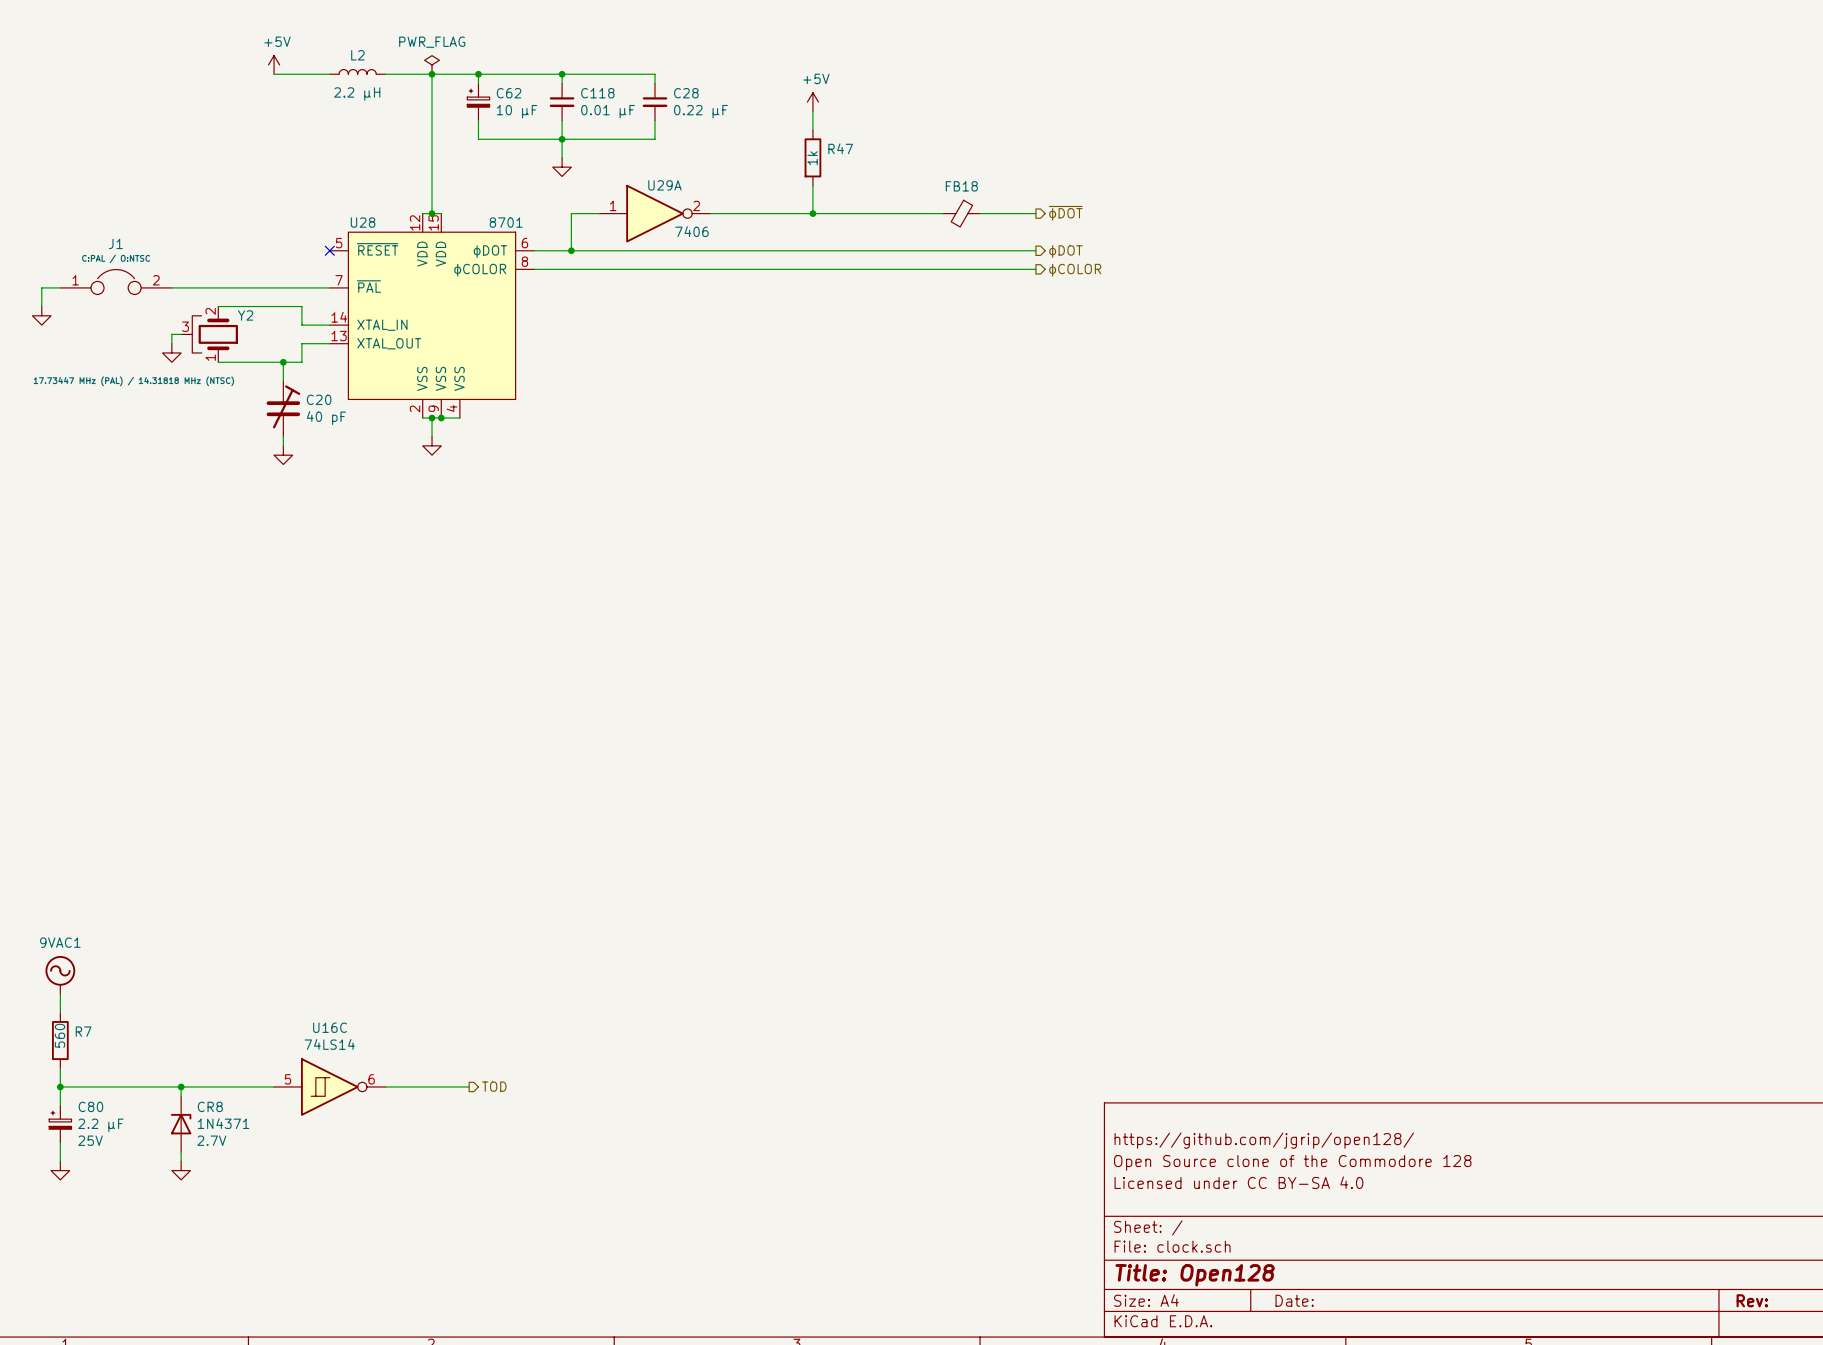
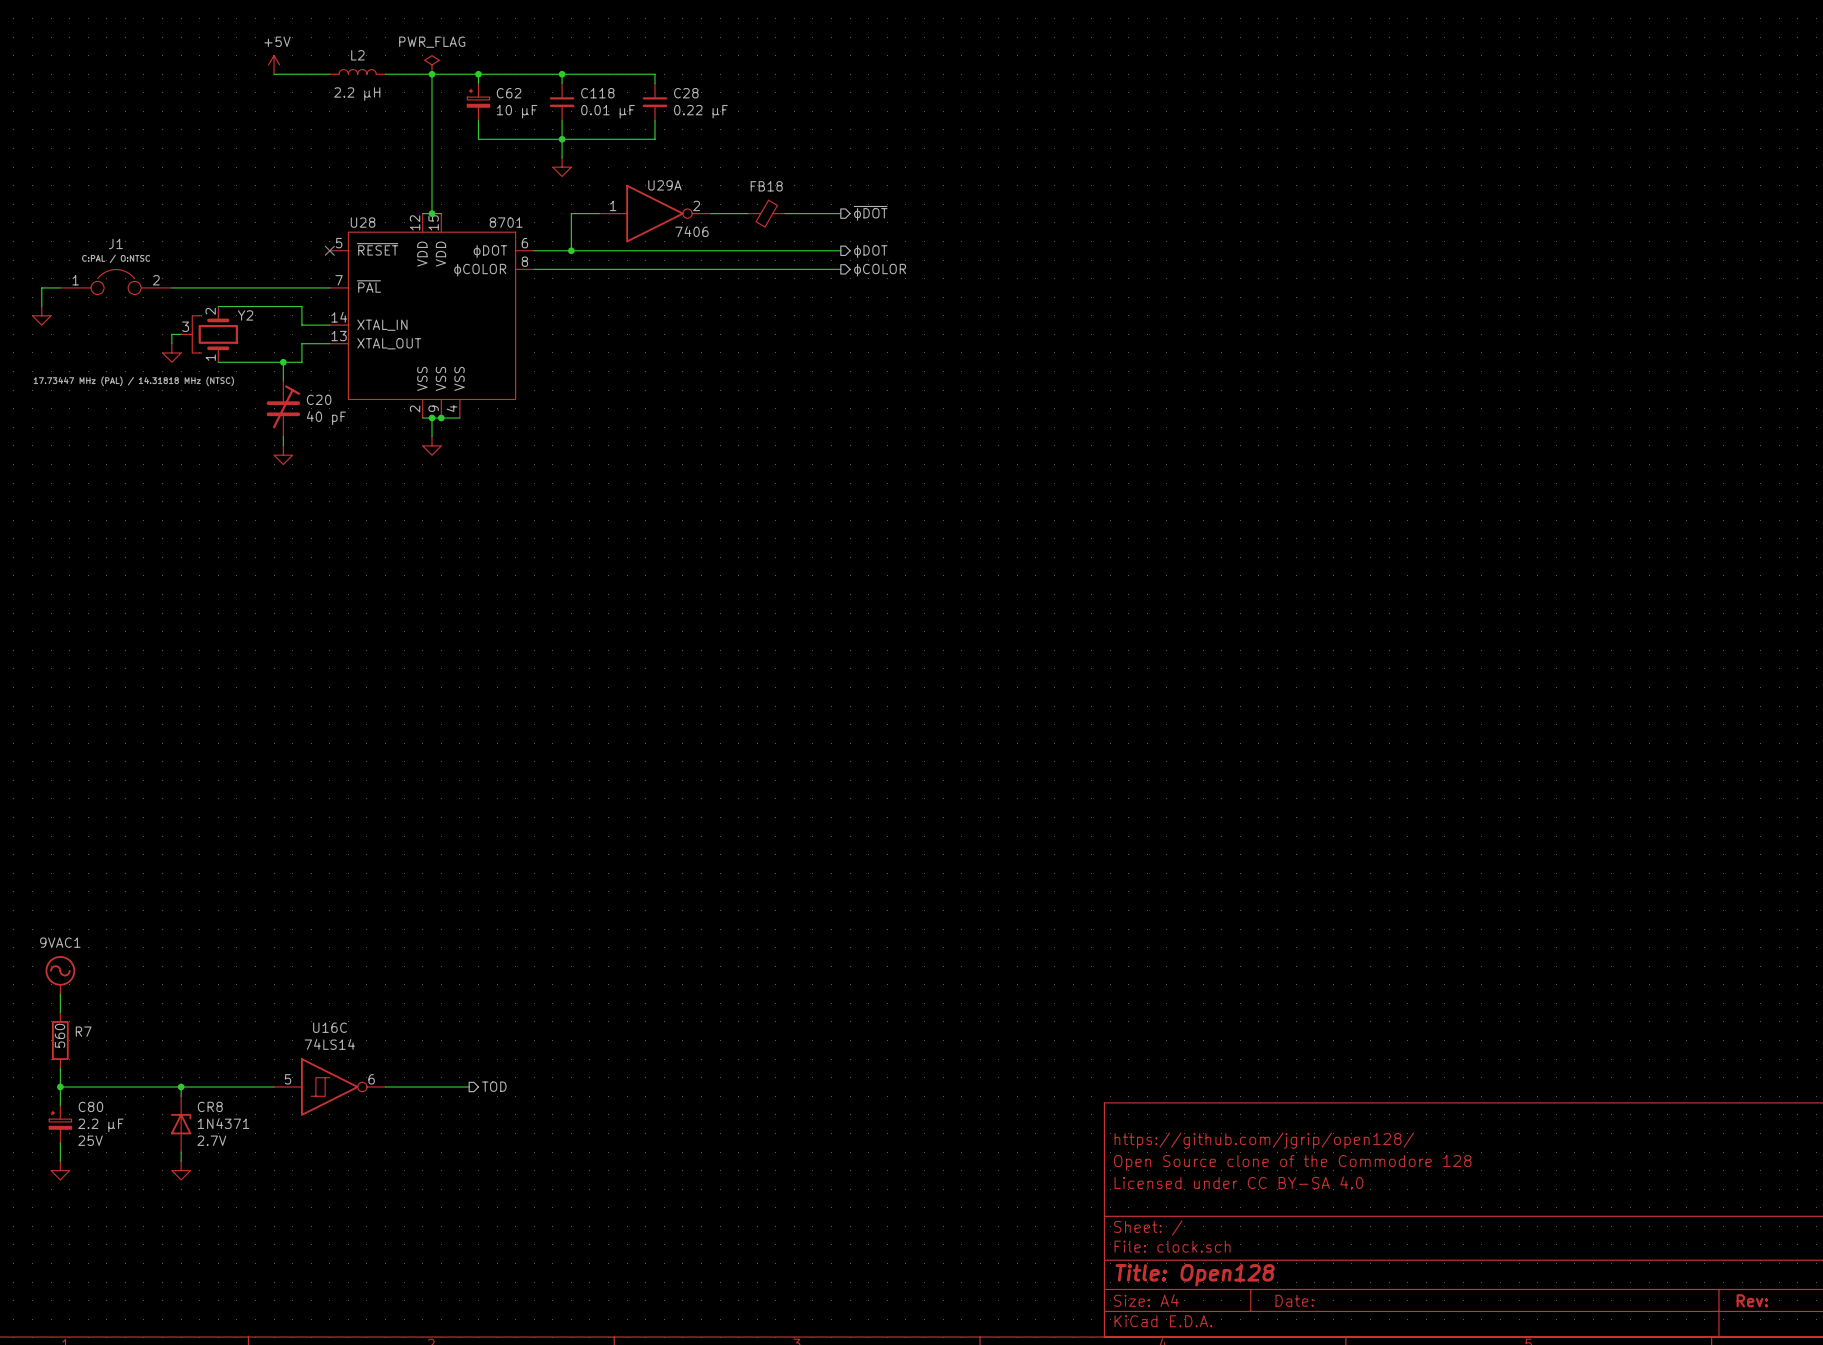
power symbol: +5V (812, 102) -> none
wire: (812, 111) (812, 129) -> none
R47: 1k (812, 157) -> none
wire: (812, 185) (812, 213) -> none
junction: (812, 213) -> none
wire: (840, 213) (943, 213) -> none
hierarchical label: none -> ~{ϕDOT} (870, 213)
FB18 position: (961, 213) -> (766, 213)
wire: (980, 213) (1035, 213) -> none
hierarchical label: ~{ϕDOT} (1065, 213) -> none
wire: (840, 250) (1035, 250) -> none
hierarchical label: none -> ϕDOT (870, 251)
hierarchical label: ϕDOT (1065, 251) -> none
wire: (840, 269) (1035, 269) -> none
hierarchical label: none -> ϕCOLOR (879, 270)
hierarchical label: ϕCOLOR (1074, 270) -> none

